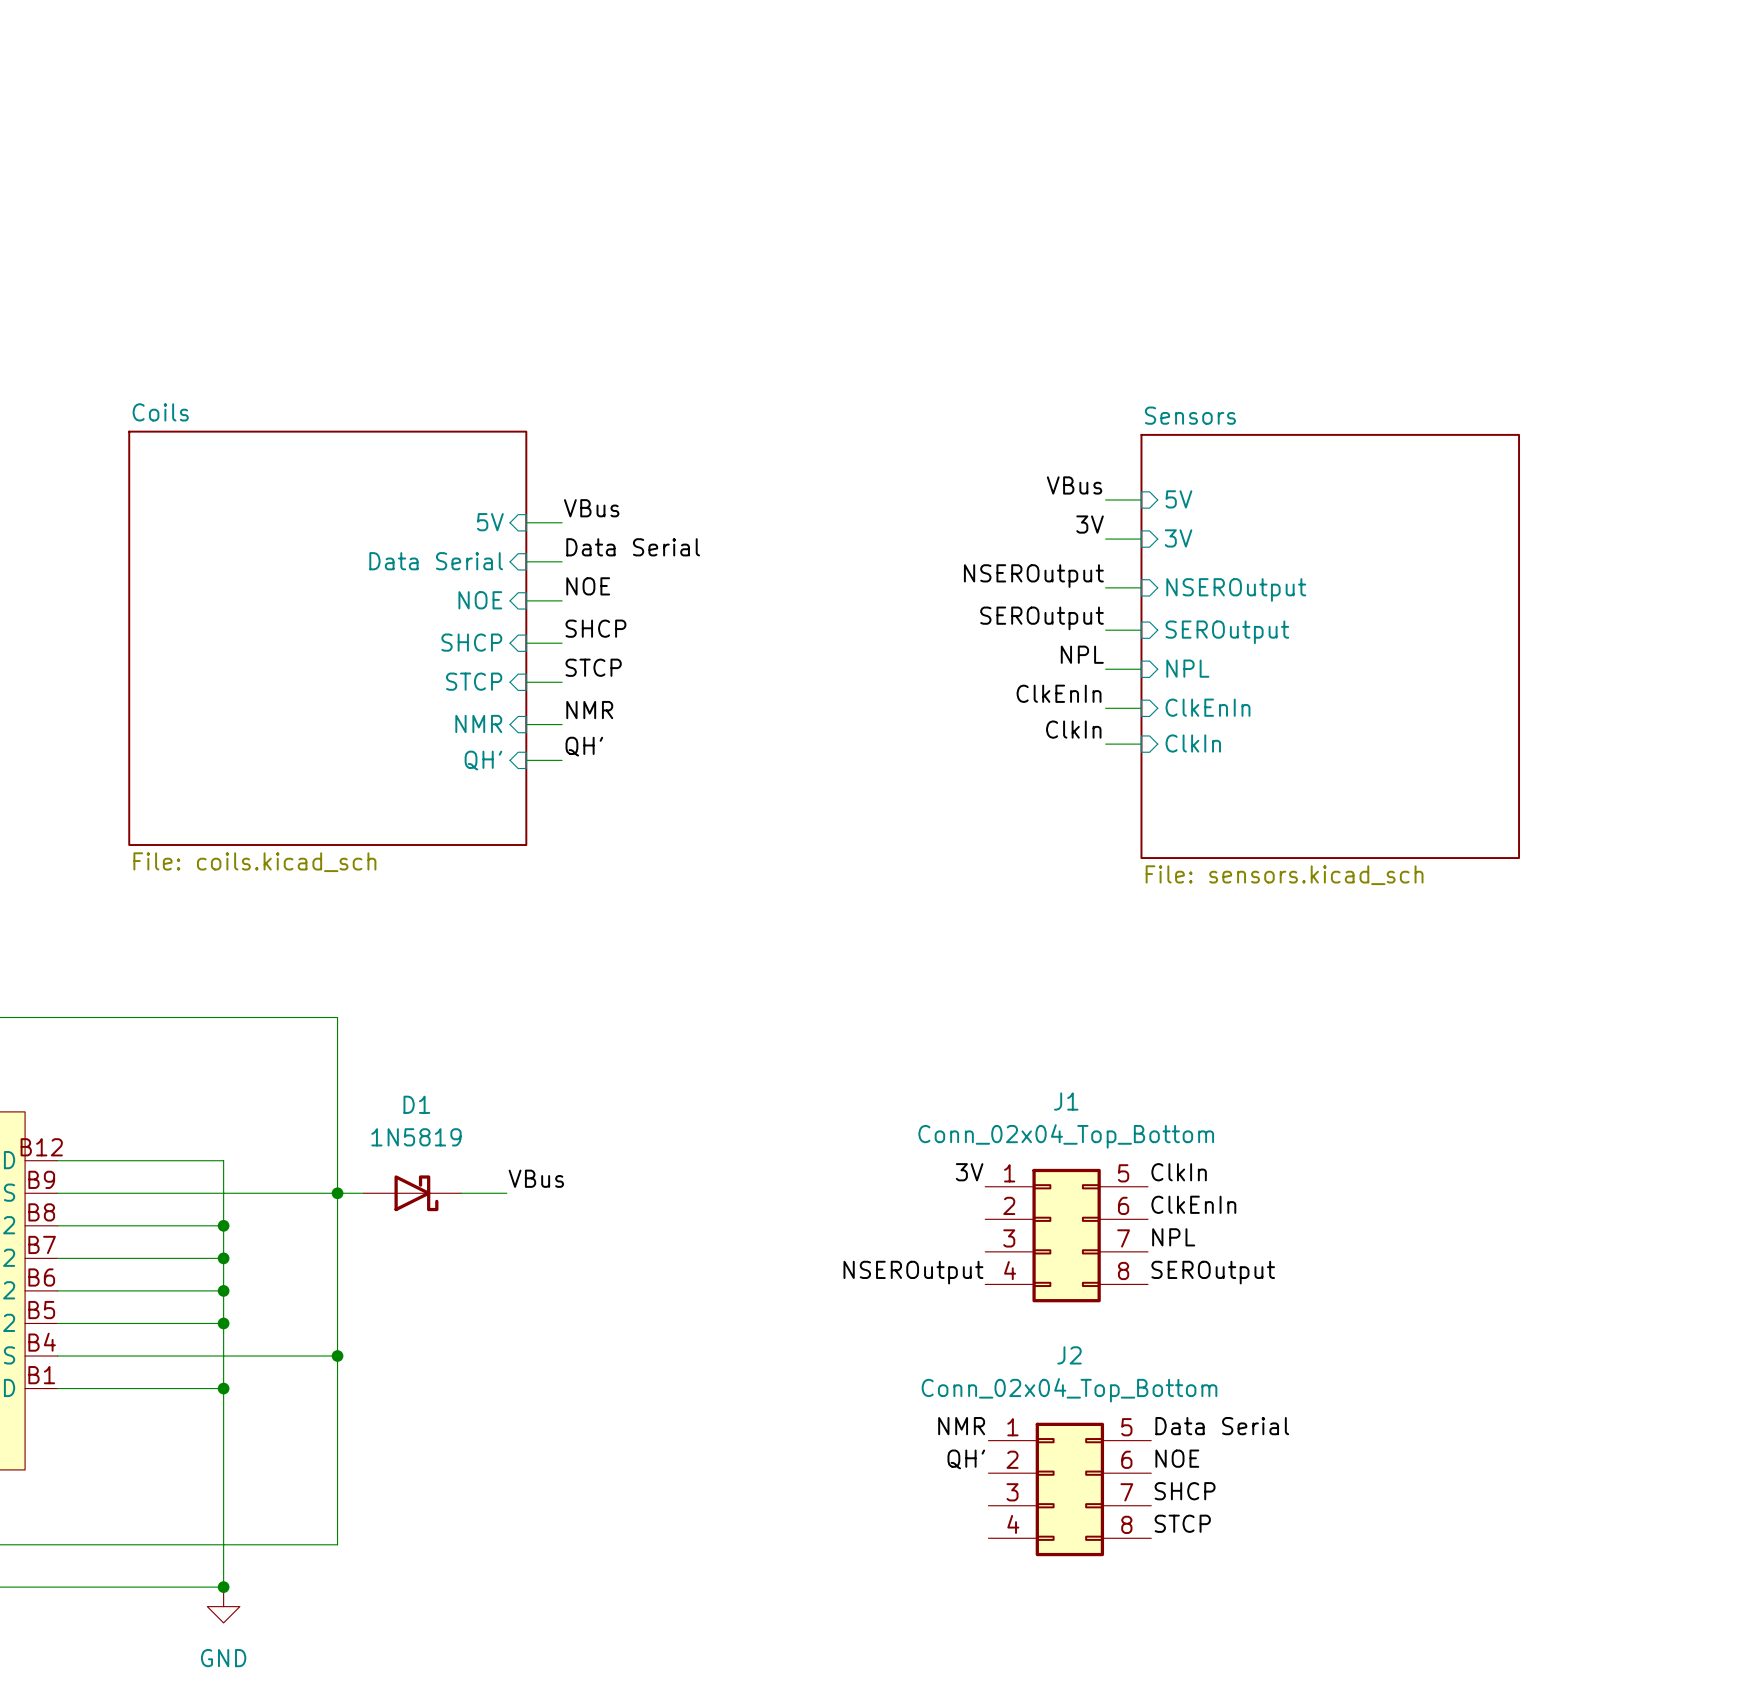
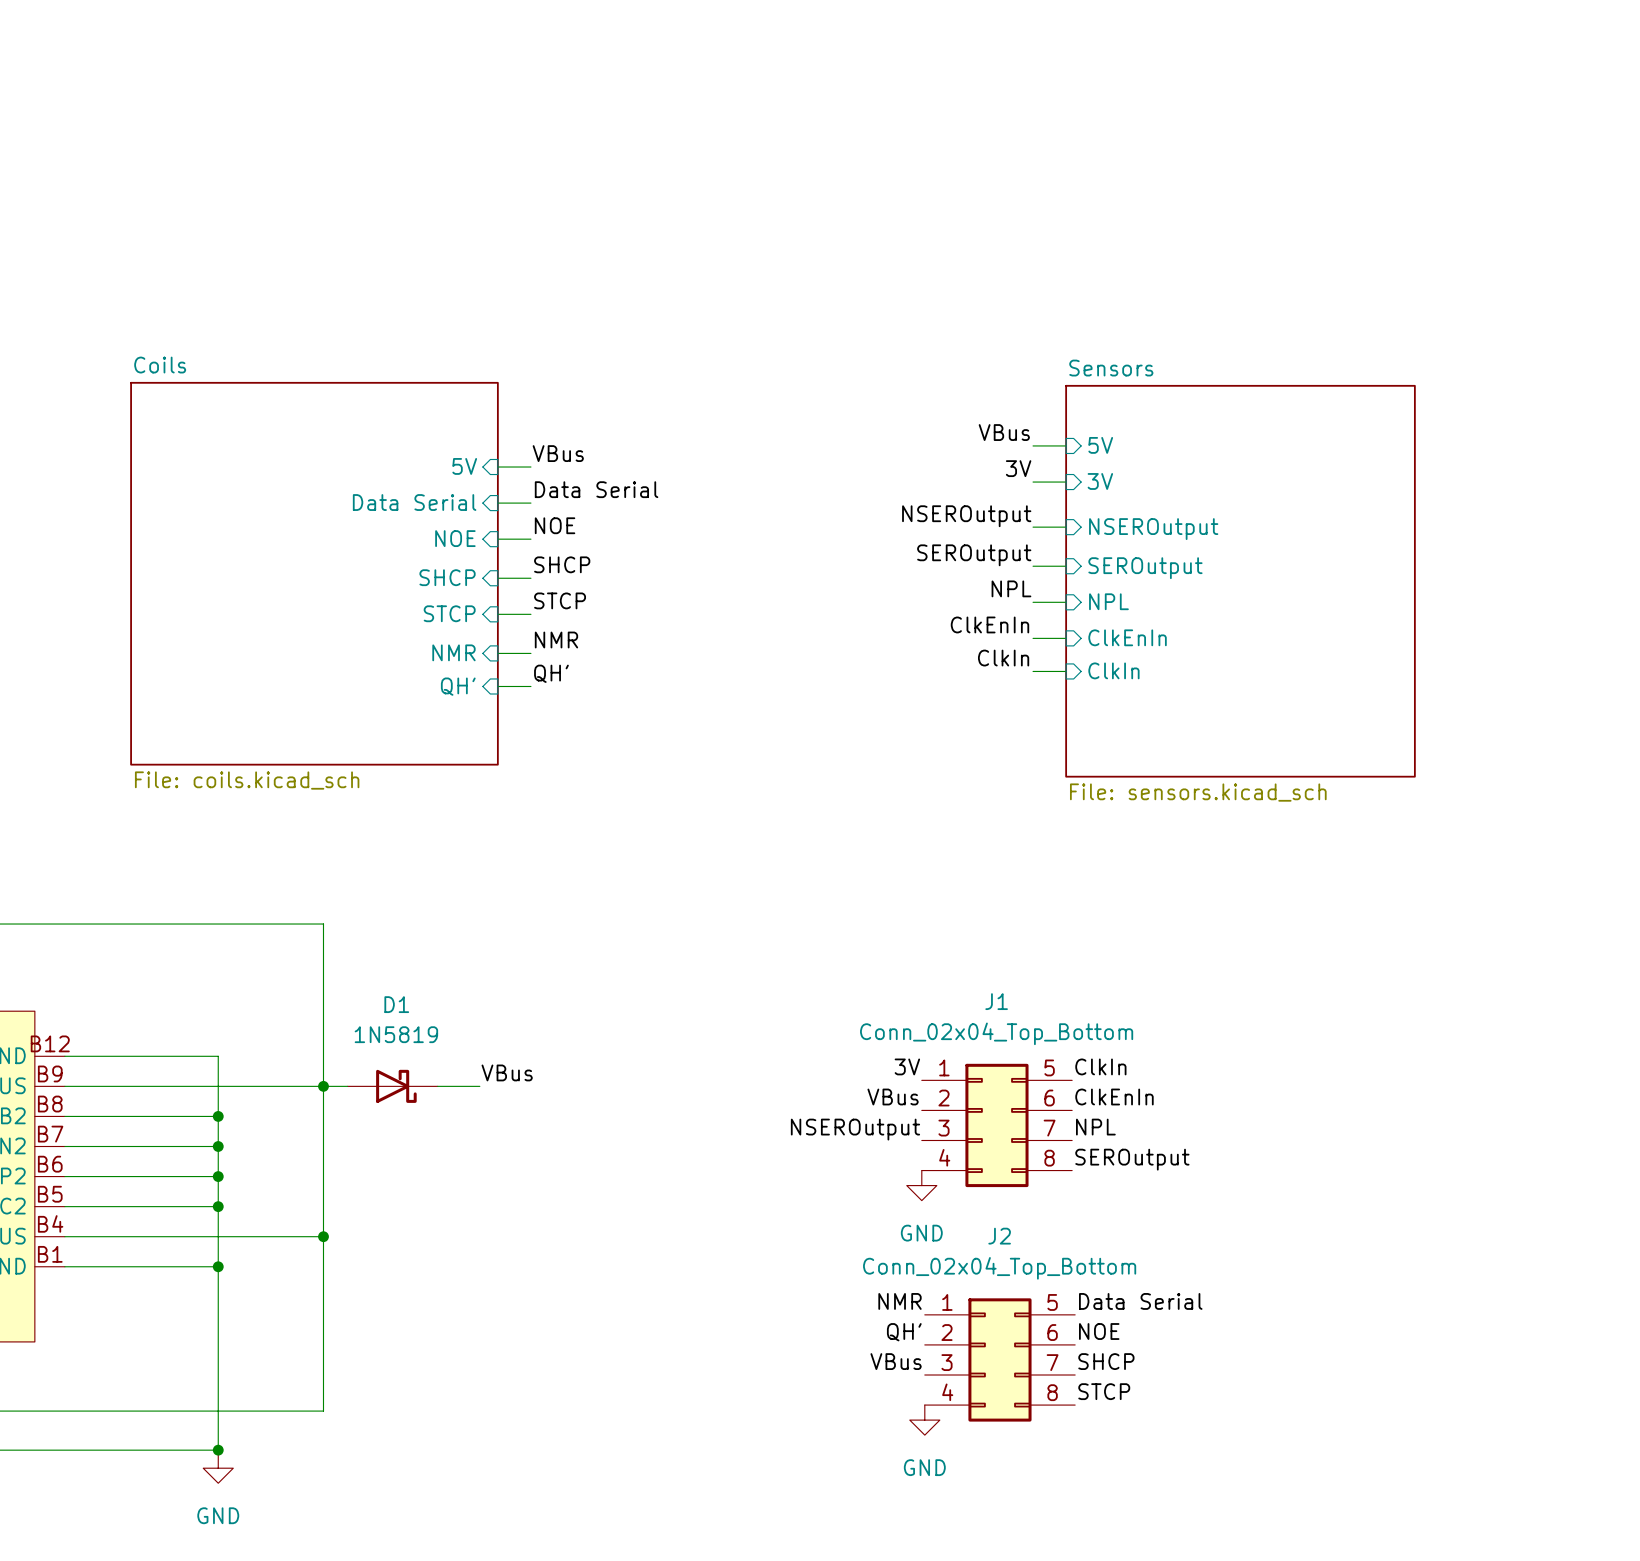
label: none -> VBus (893, 1097)
label position: NSEROutput (913, 1272) -> NSEROutput (855, 1129)
power symbol: none -> GND (921, 1185)
label: none -> VBus (896, 1361)
power symbol: none -> GND (924, 1420)

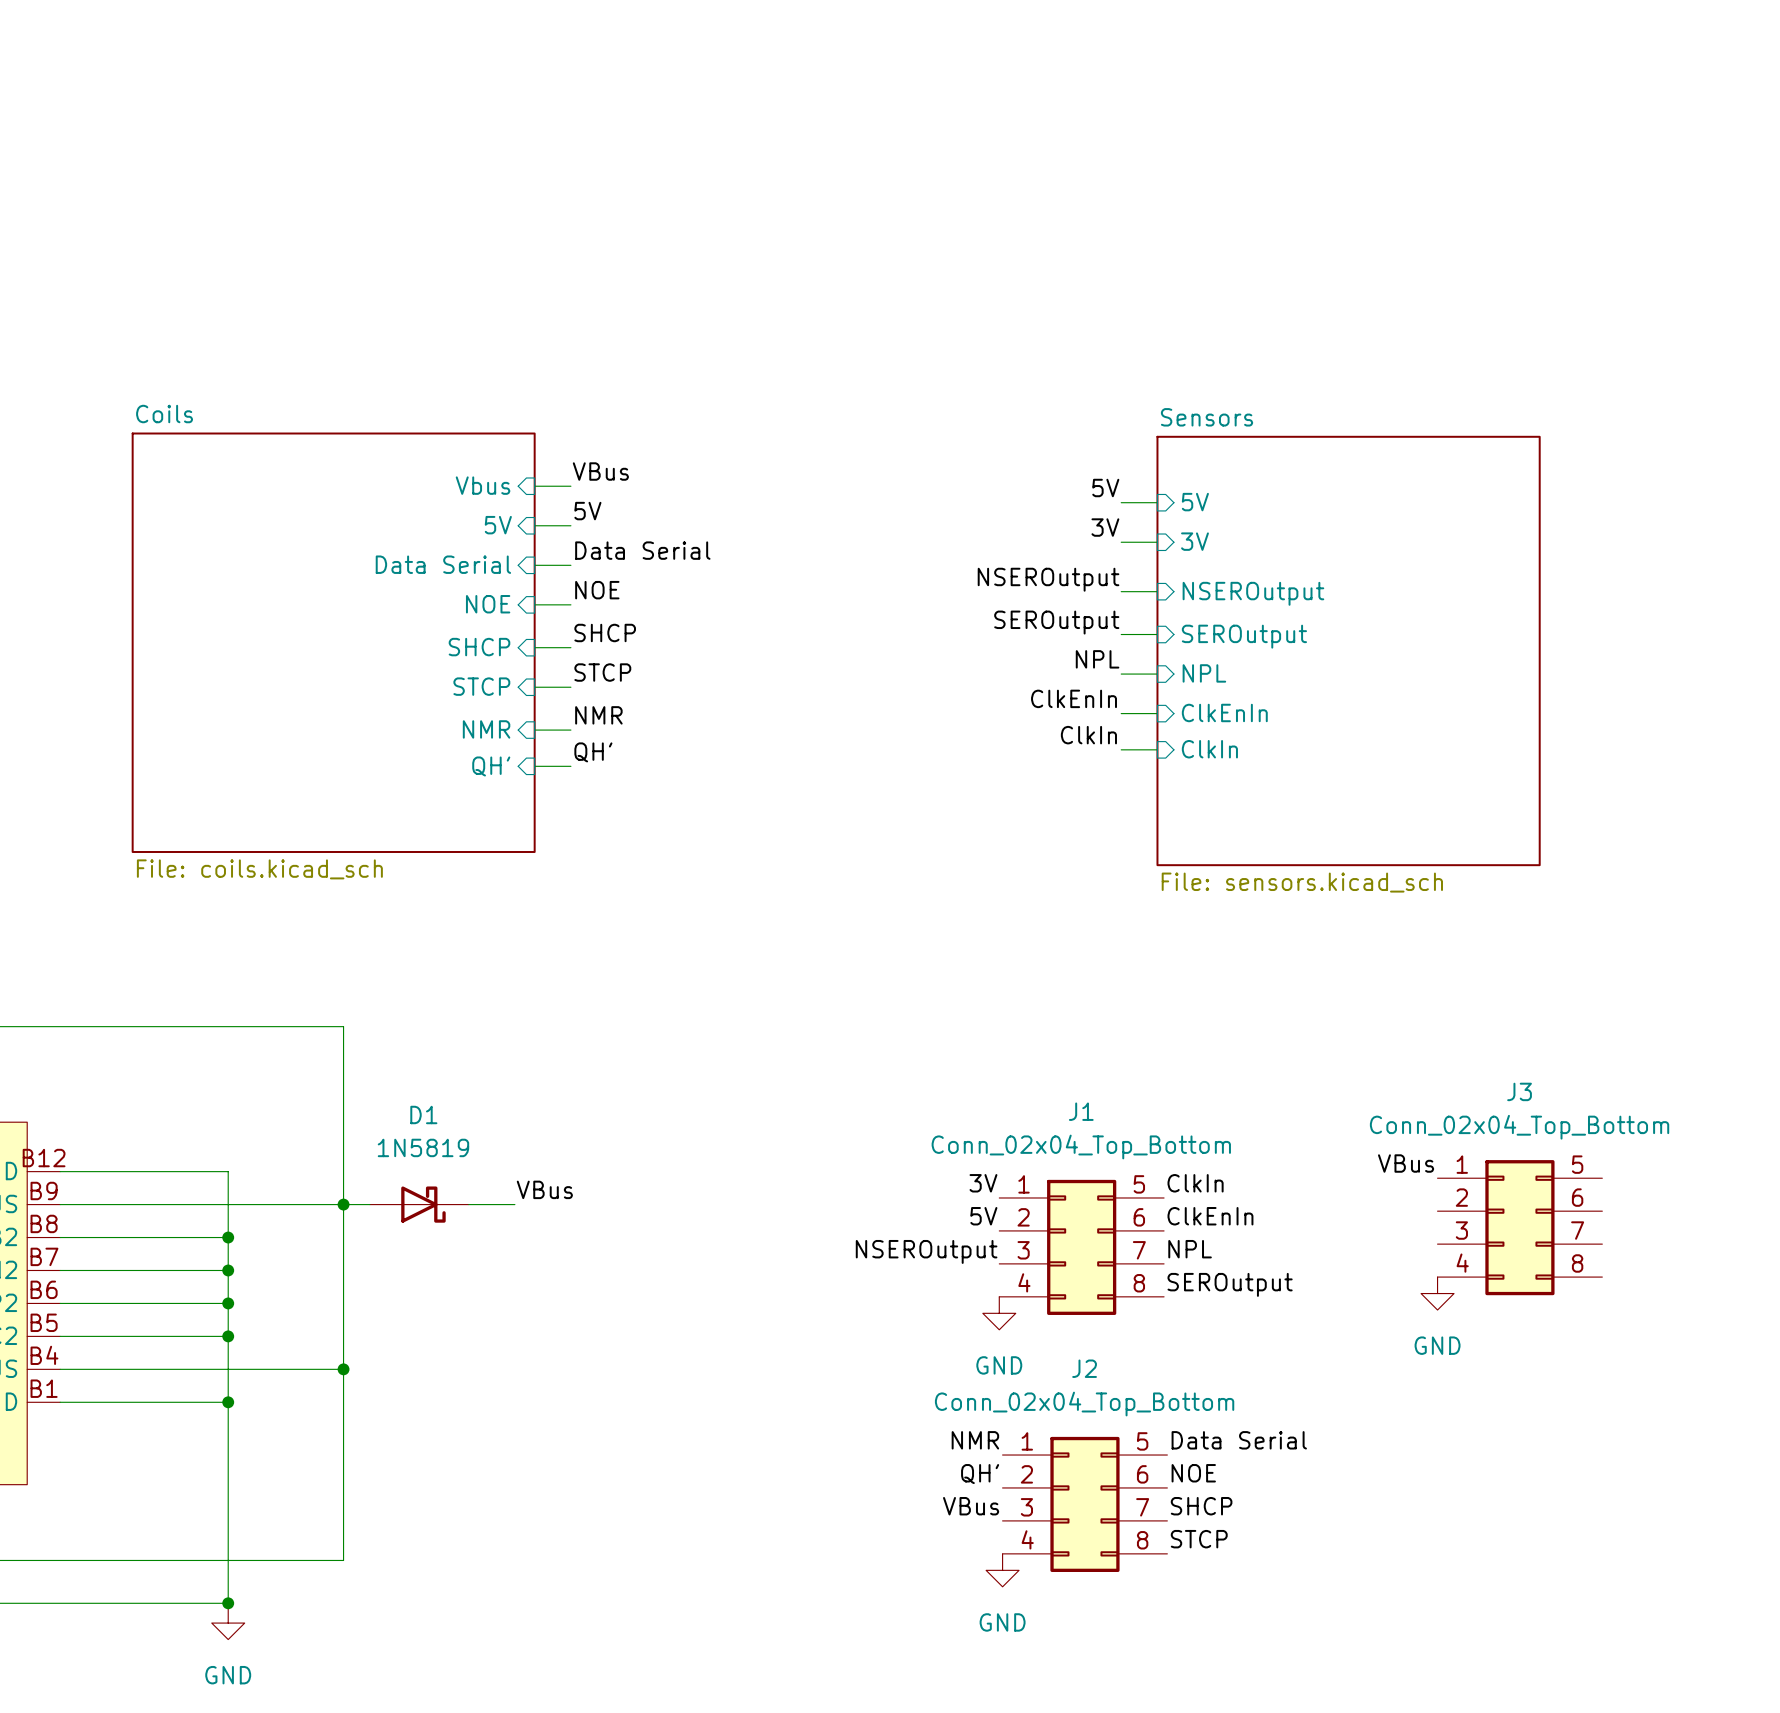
label: none -> VBus (600, 471)
sheet pin: none -> Vbus (483, 485)
wire: none -> (534, 486) (570, 486)
label: VBus (1004, 432) -> 5V (1105, 488)
label: VBus (558, 453) -> 5V (587, 511)
label: none -> VBus (1406, 1163)
label: VBus (893, 1097) -> 5V (983, 1216)
J3: none -> Conn_02x04_Top_Bottom (1519, 1227)
power symbol: none -> GND (1437, 1293)

